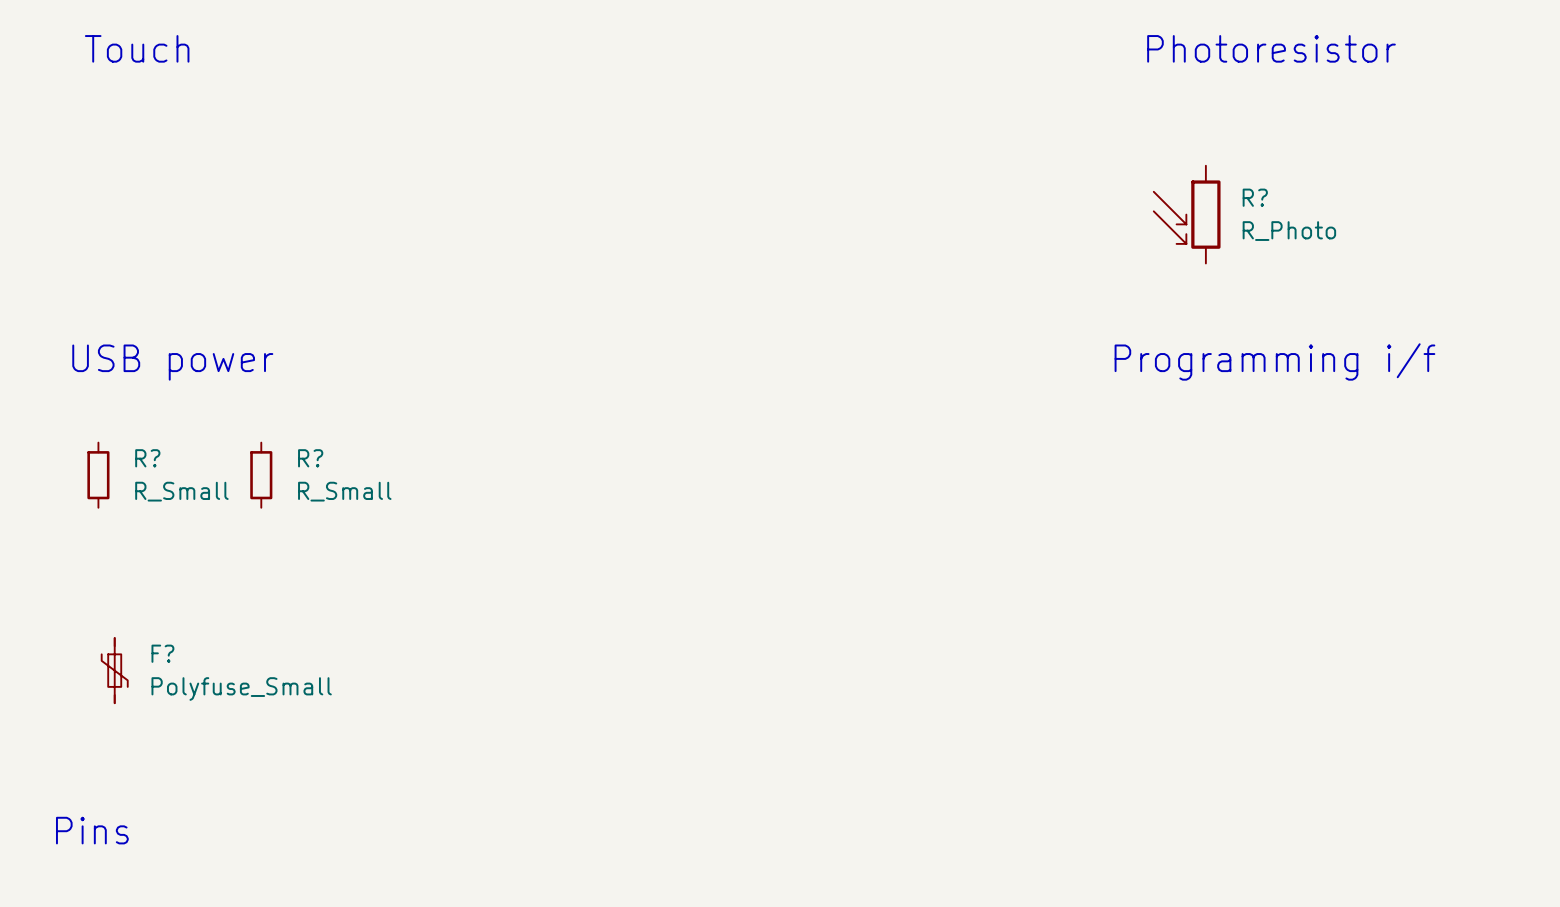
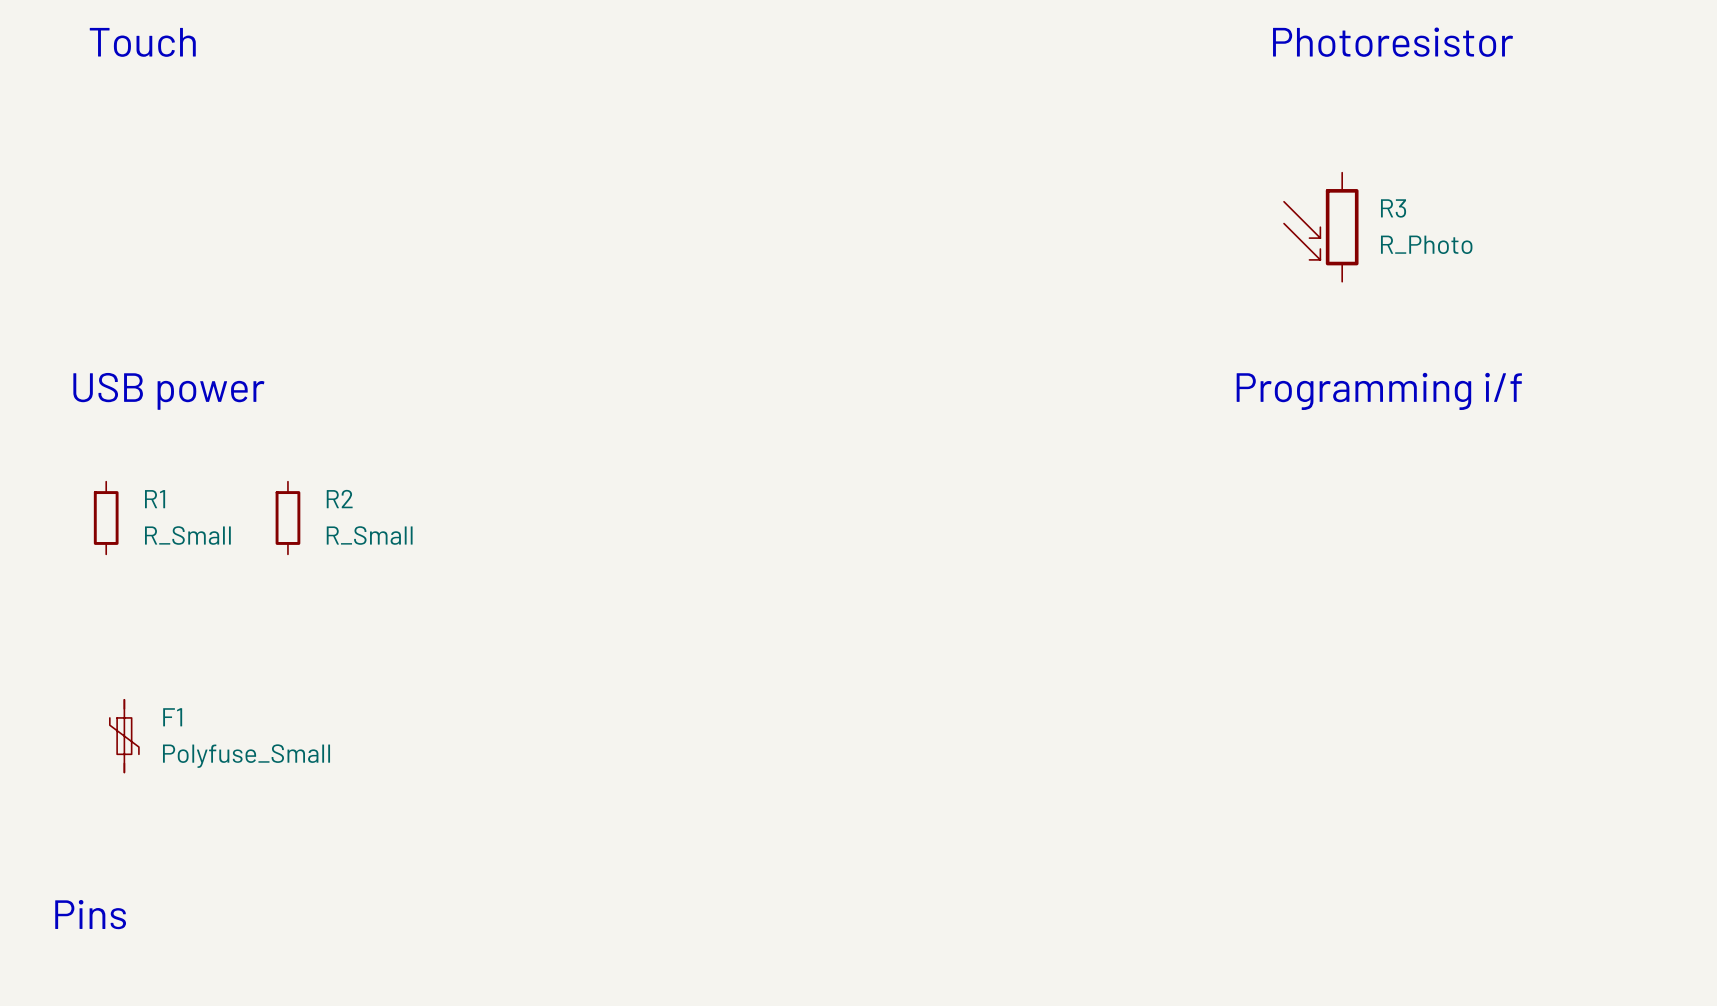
R? name: R? (1255, 197) -> R3 (1393, 208)
R? name: R? (147, 458) -> R1 (155, 499)
R? name: R? (310, 458) -> R2 (339, 499)
F? name: F? (162, 653) -> F1 (172, 717)

